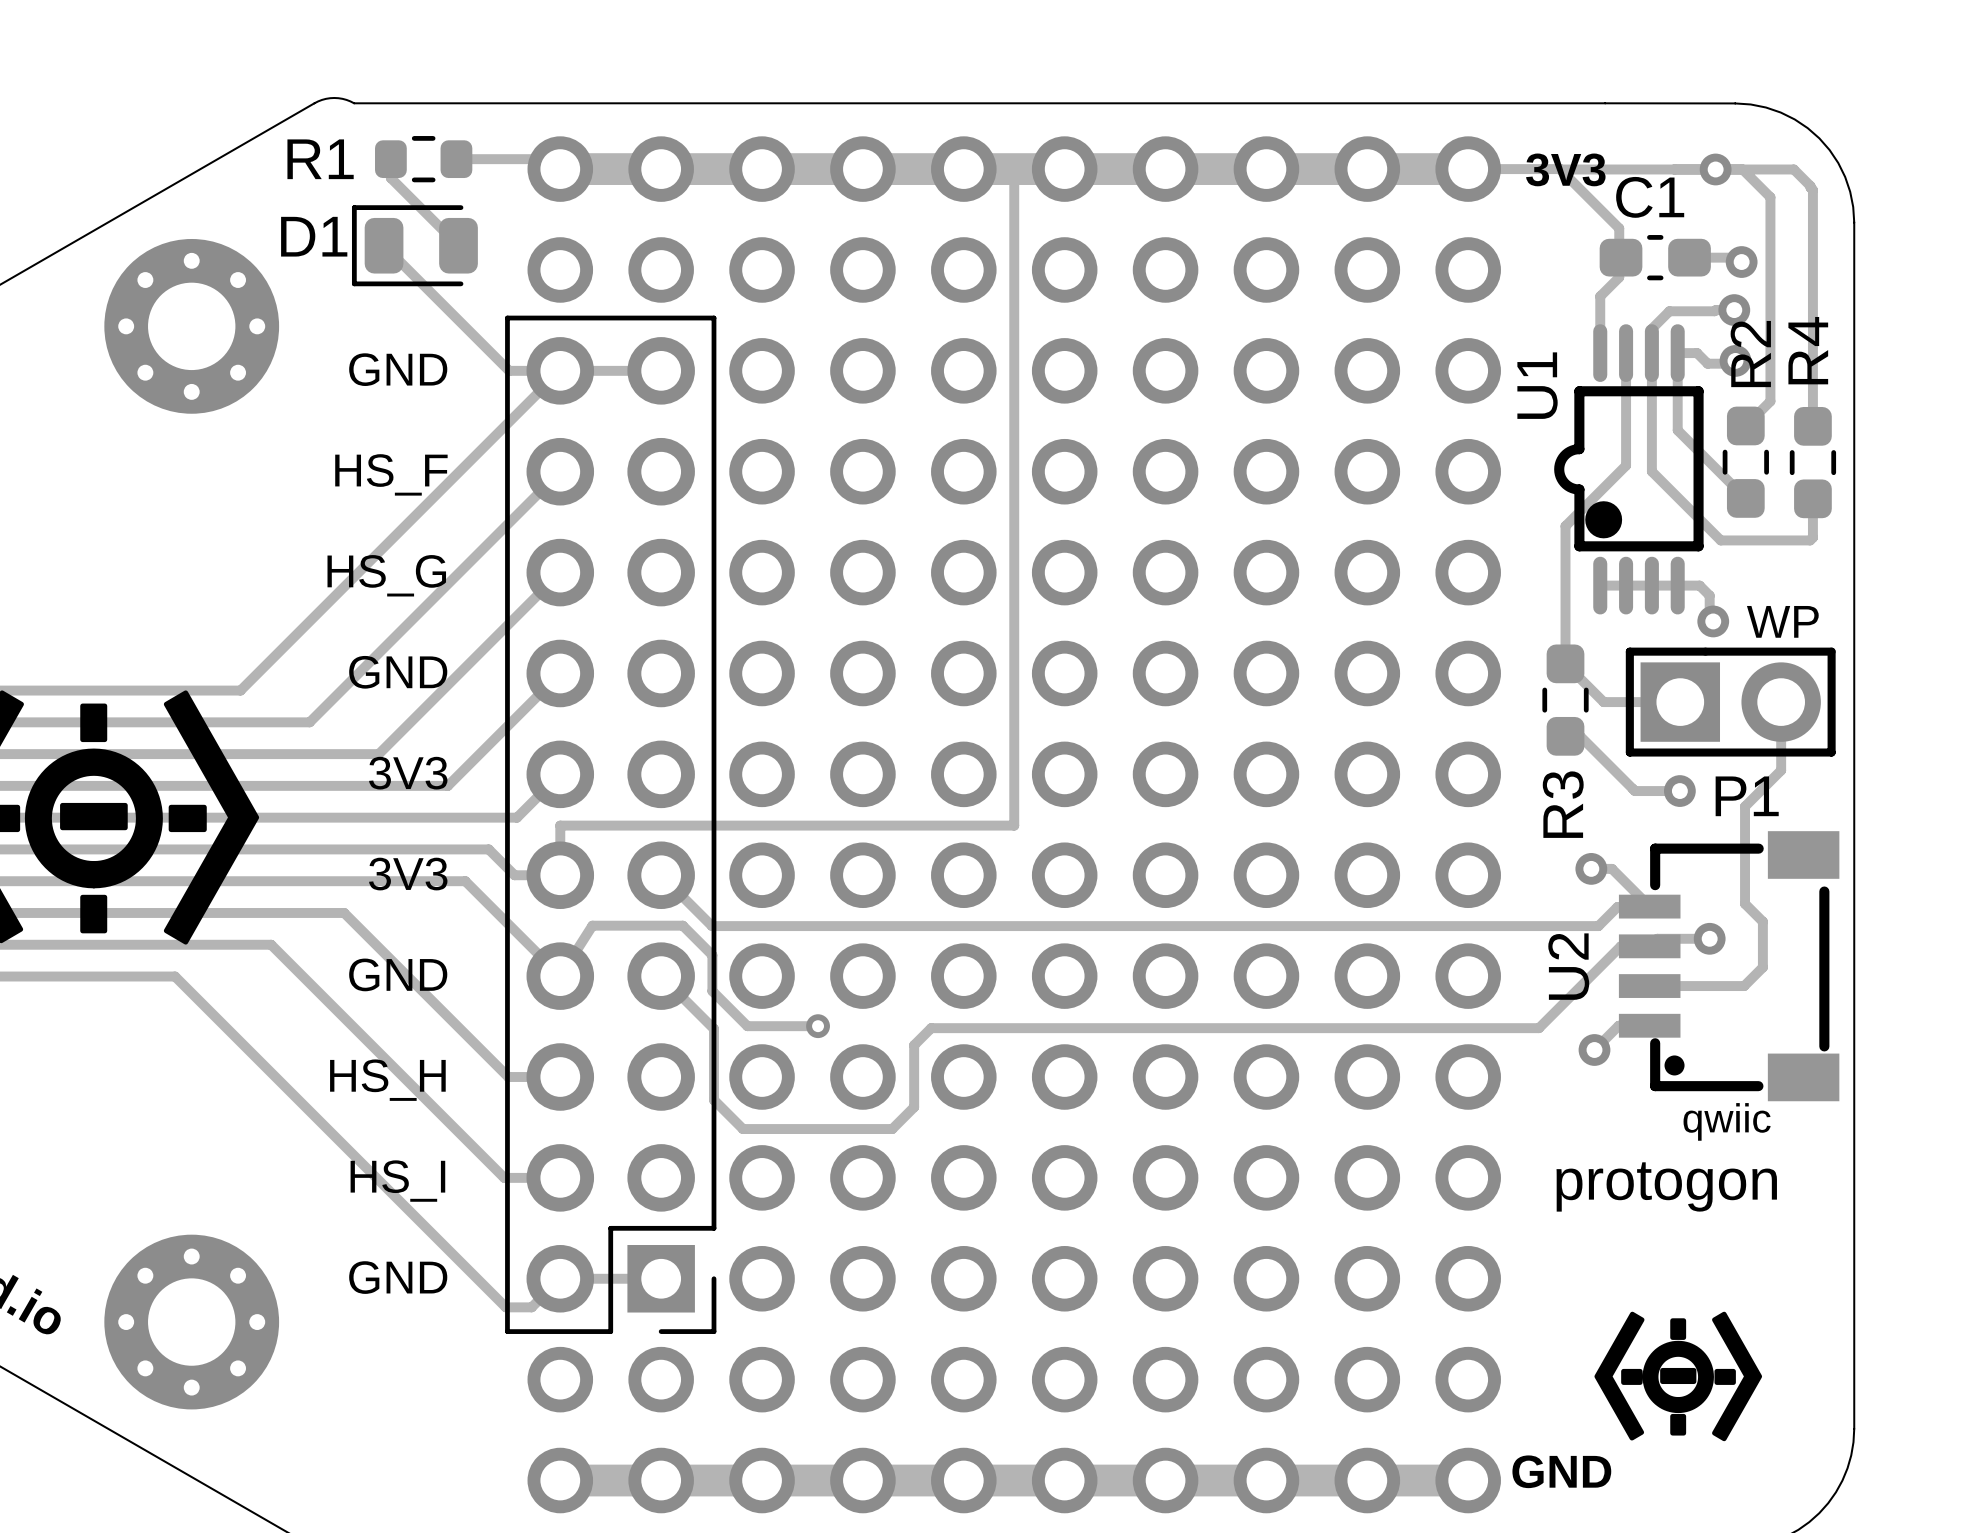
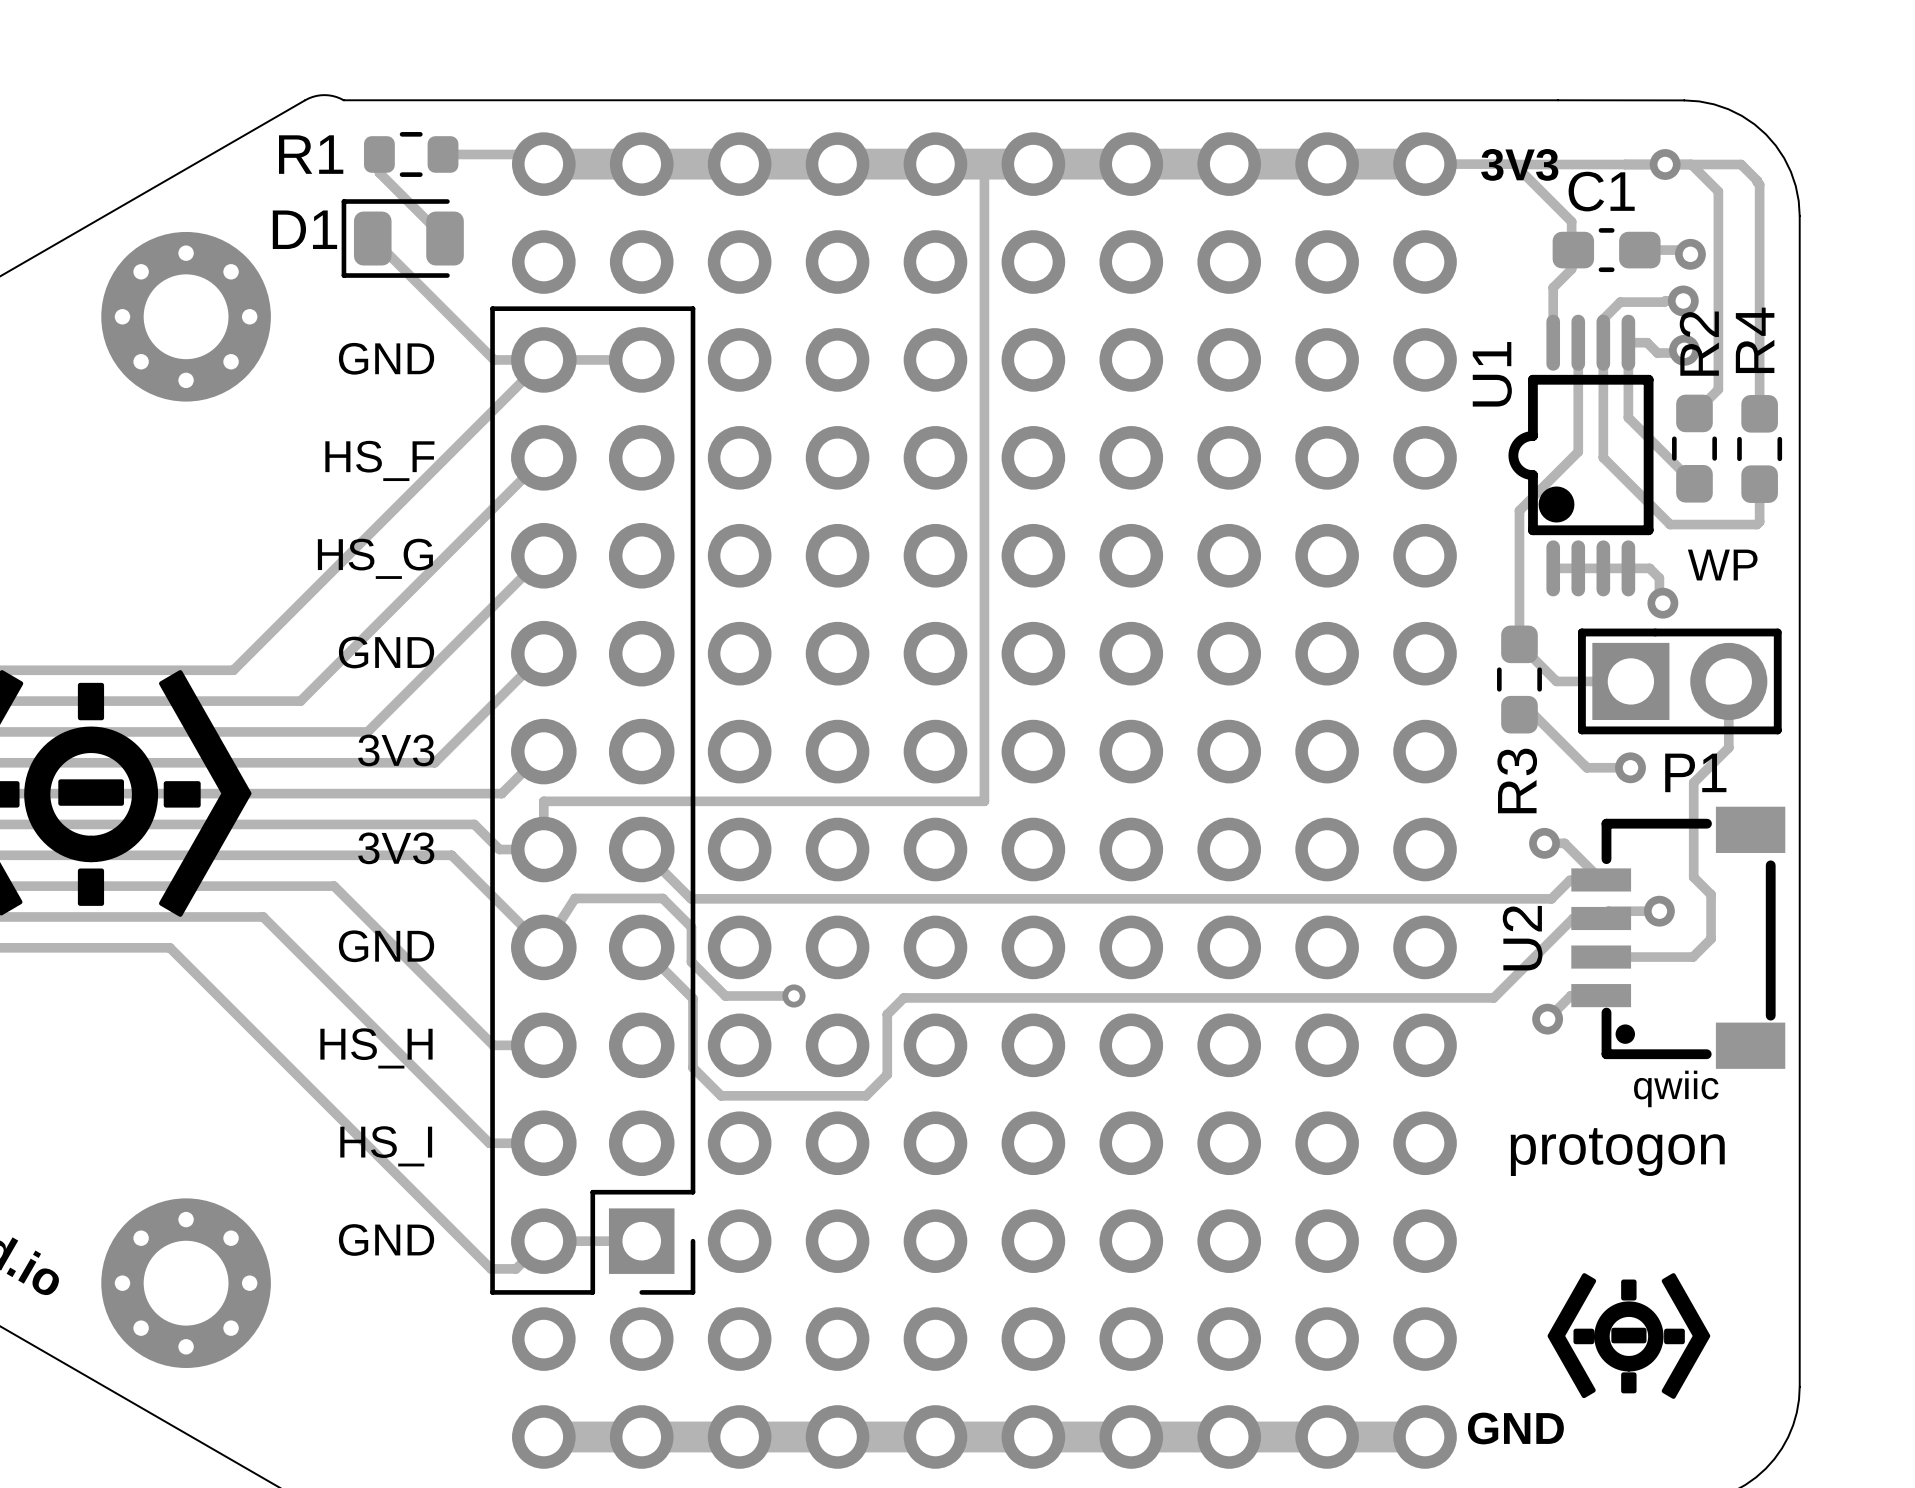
text position: WP (1782, 621) -> WP (1722, 565)

